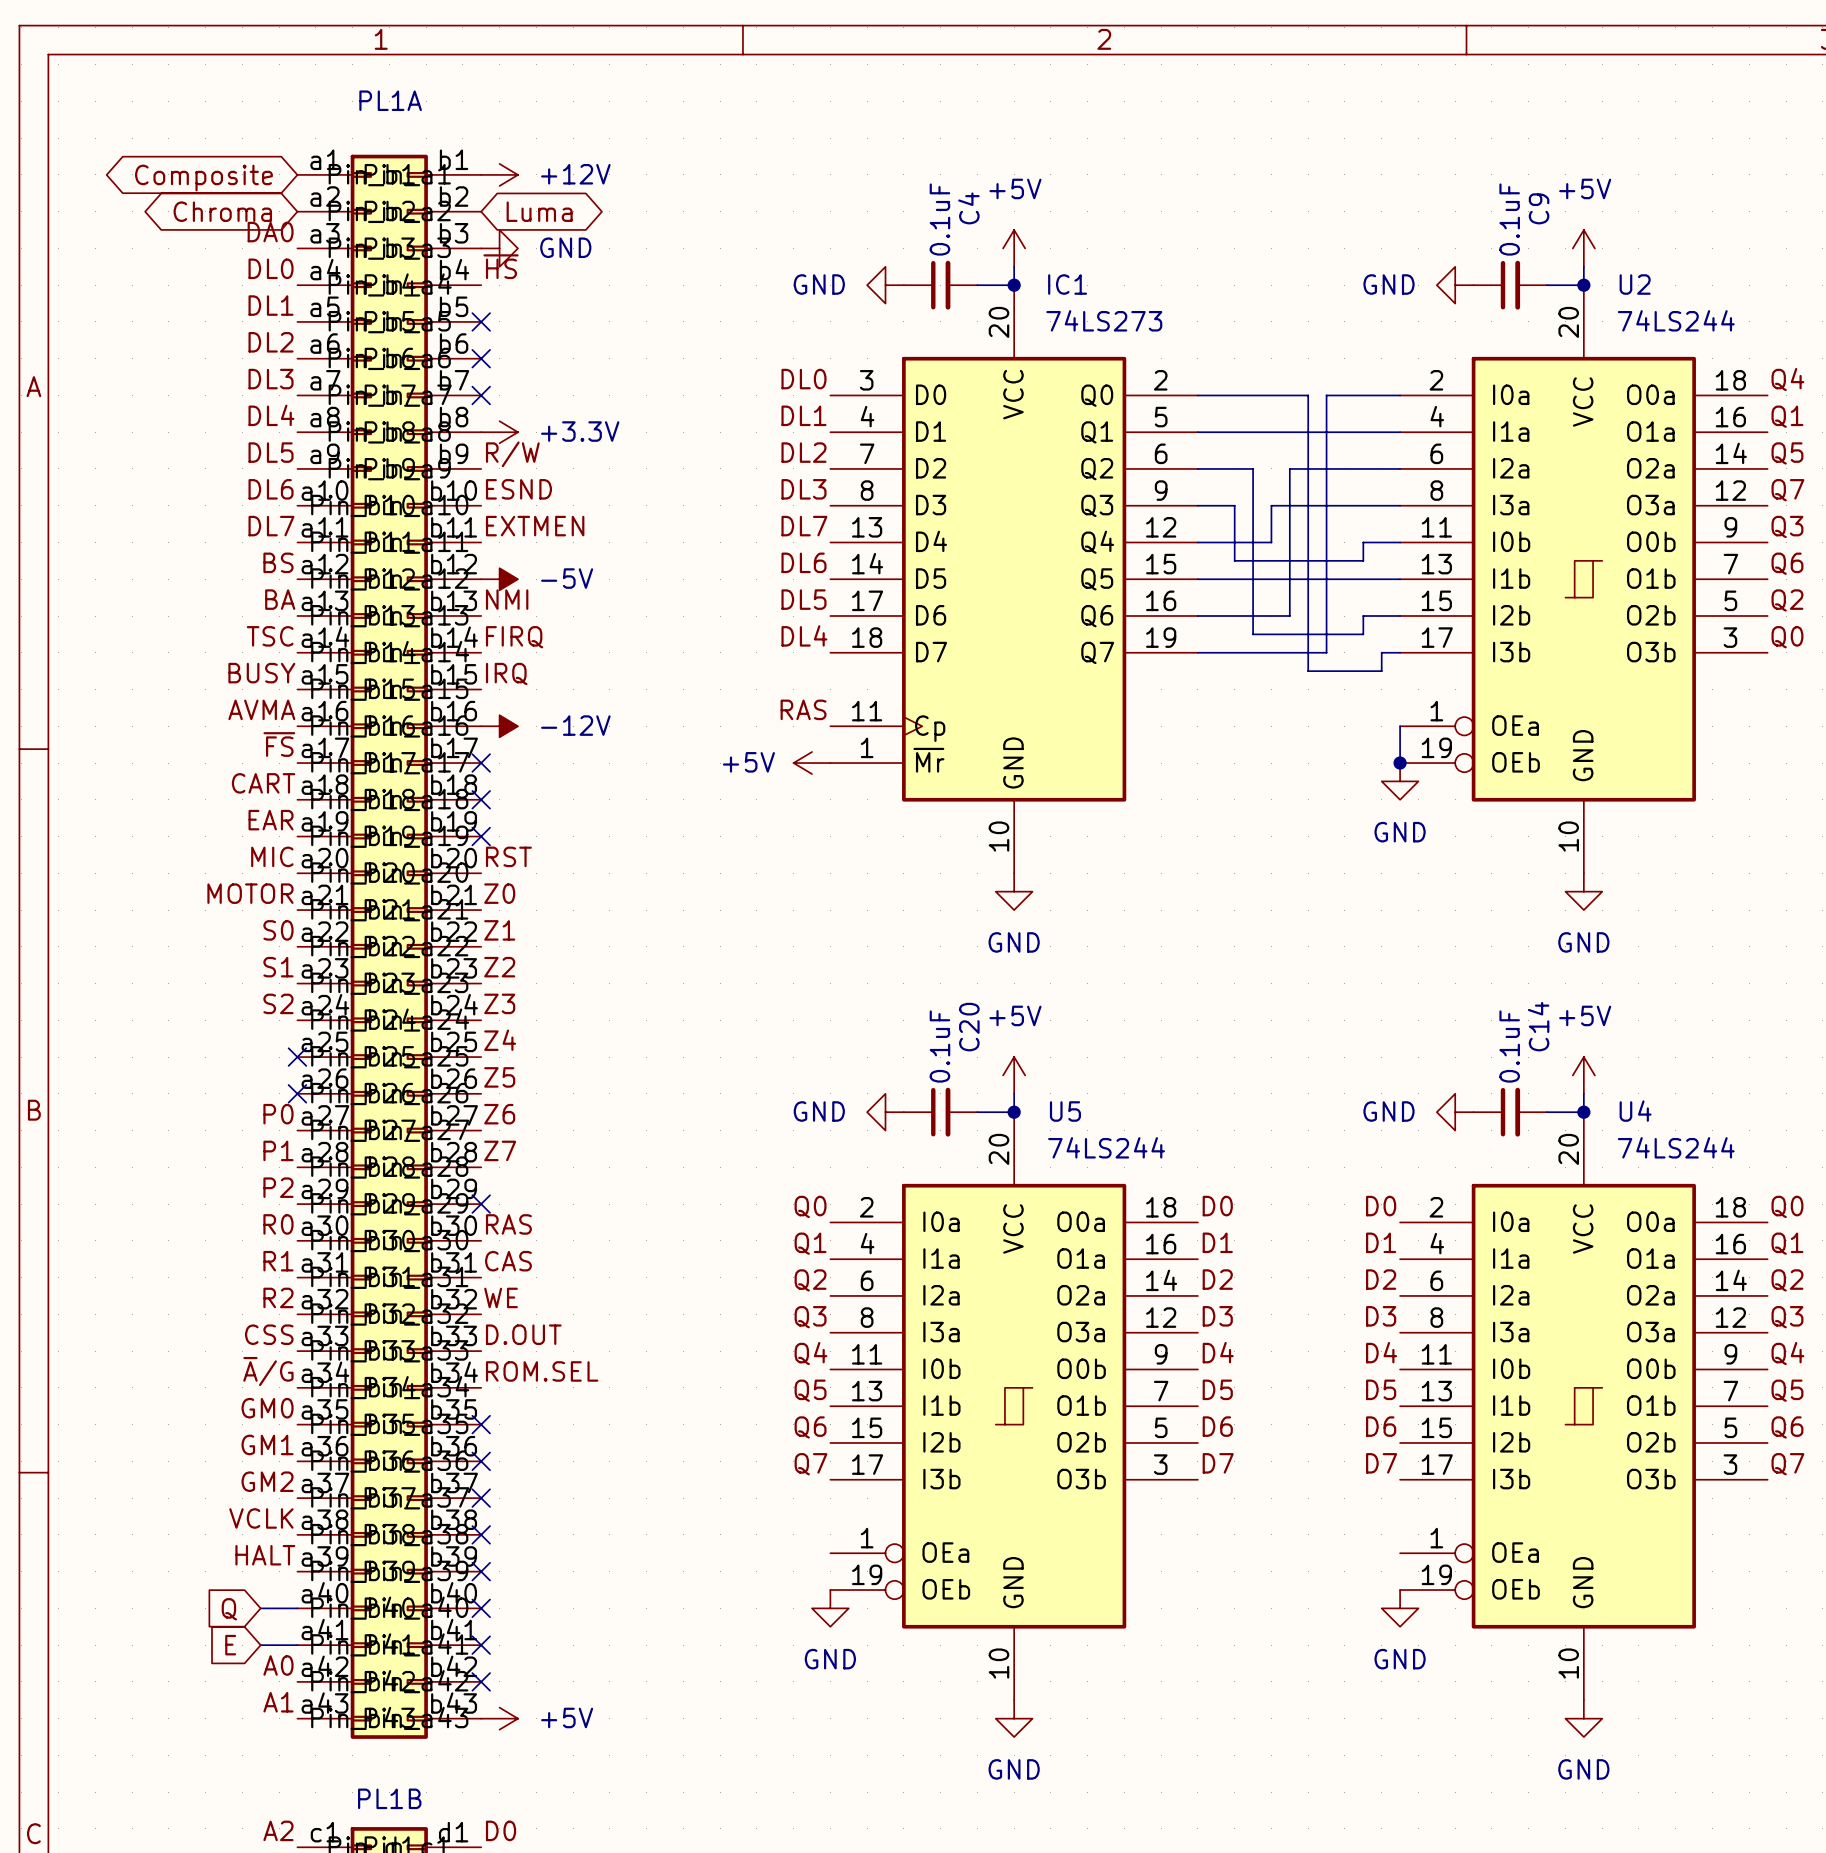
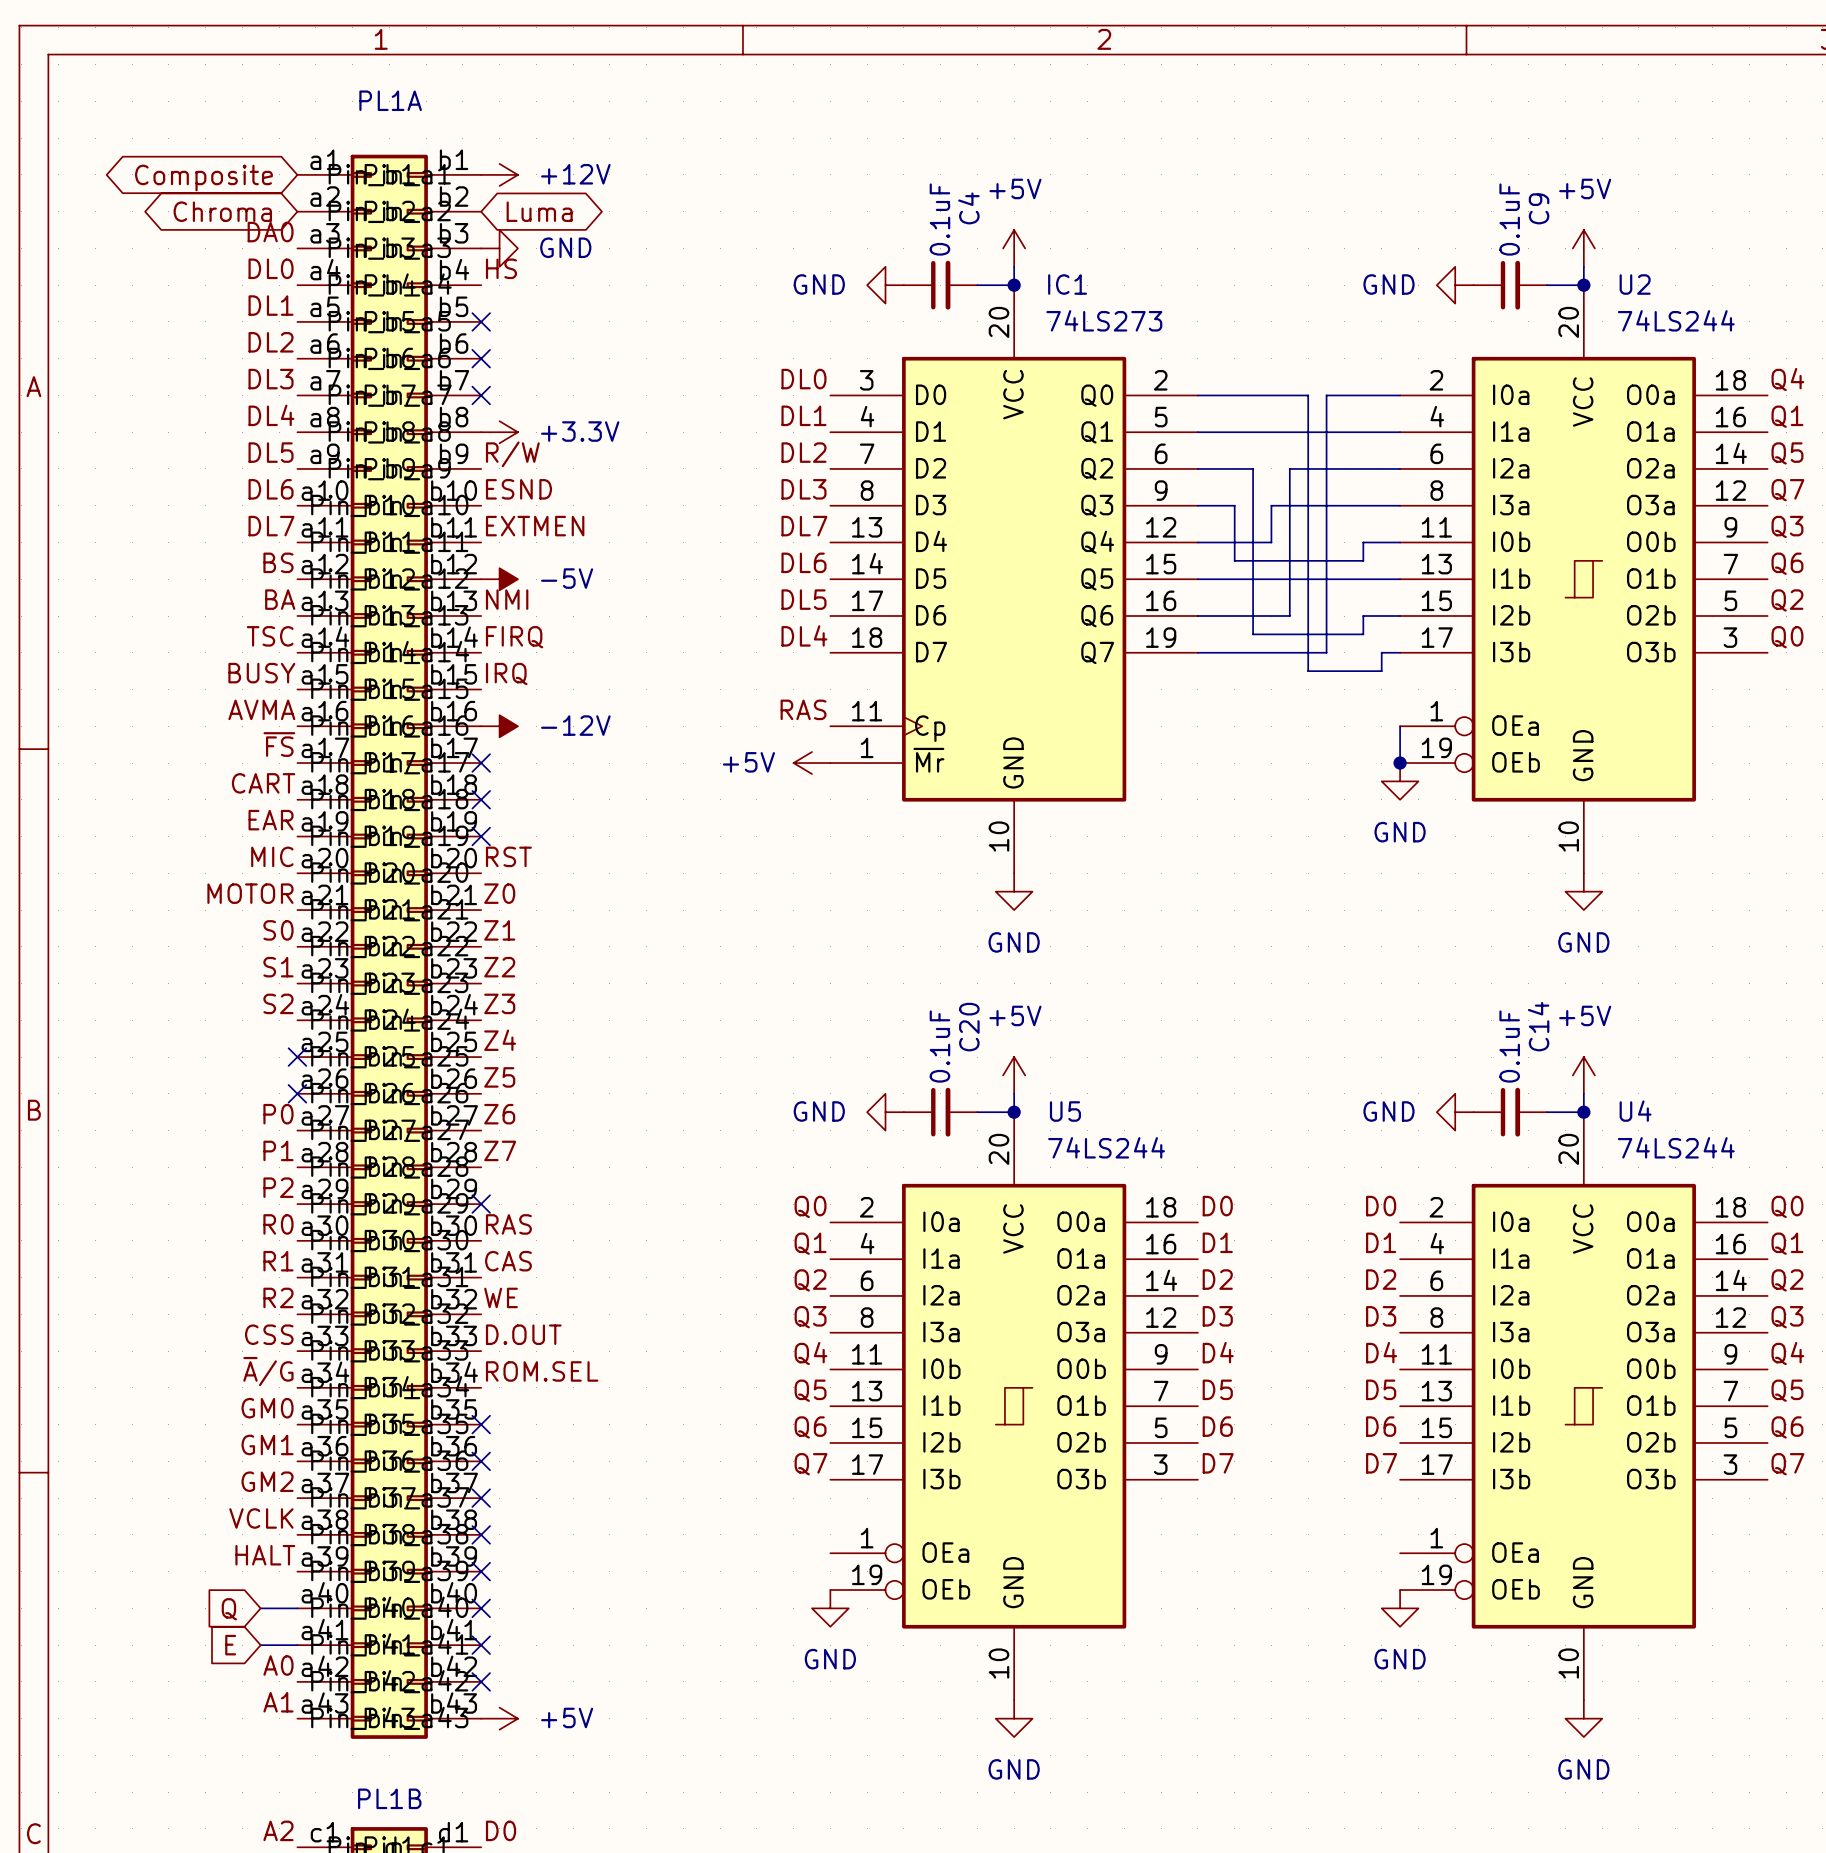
label: ~{HS} (501, 266) -> HS (501, 268)

